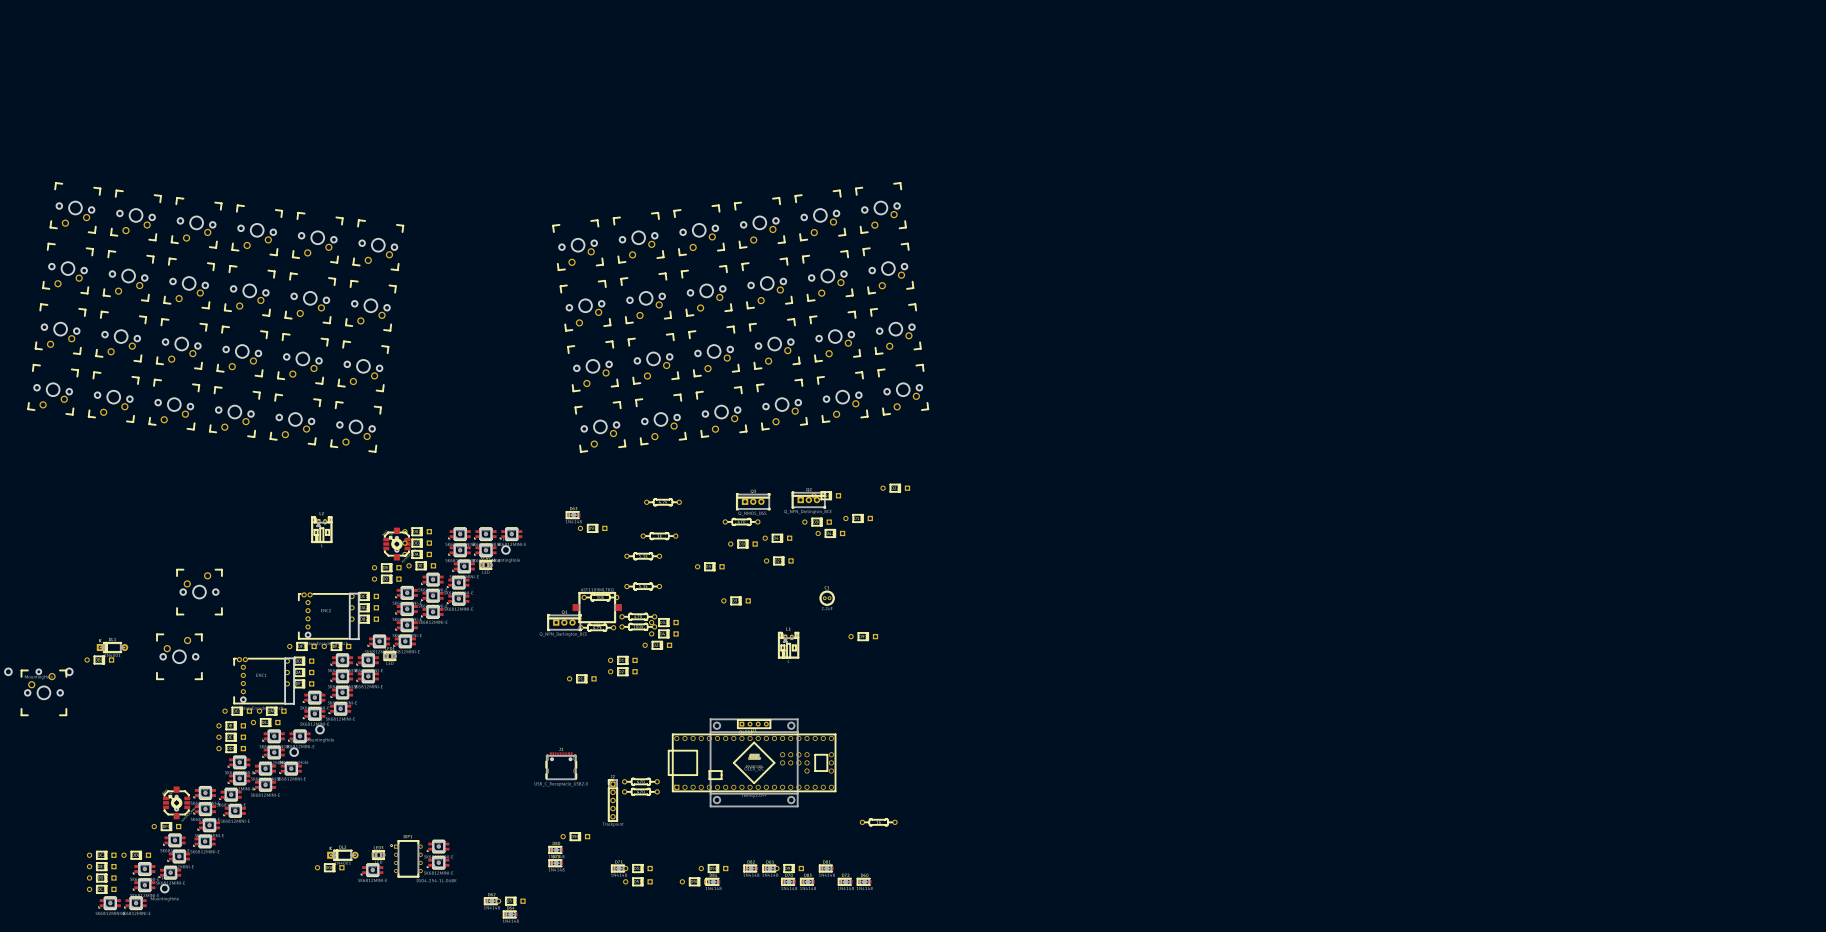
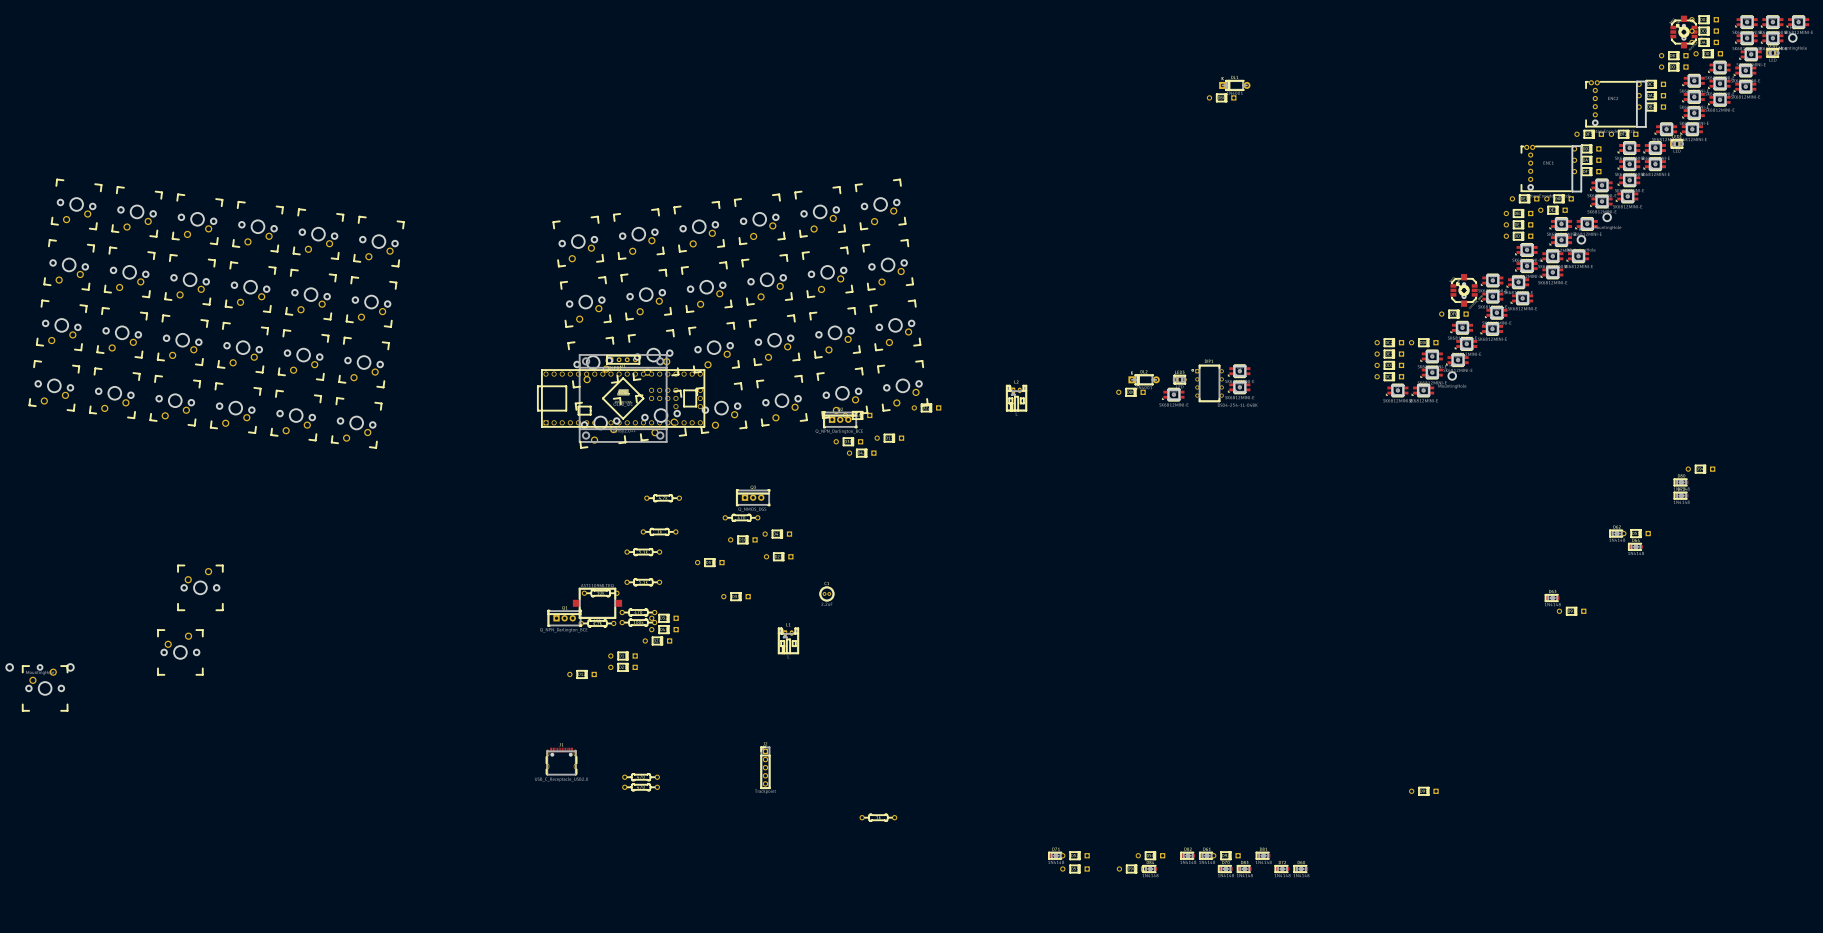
part position: (895, 488) -> (926, 407)
part position: (826, 495) -> (857, 415)
part position: (808, 499) -> (840, 419)
part position: (573, 515) -> (1552, 597)
part position: (858, 518) -> (889, 438)
part position: (817, 522) -> (848, 441)
part position: (592, 528) -> (1571, 611)
part position: (321, 529) -> (1016, 398)
part position: (417, 531) -> (1704, 19)
part position: (830, 533) -> (861, 453)
part position: (459, 534) -> (1746, 22)
part position: (485, 534) -> (1772, 22)
part position: (511, 534) -> (1797, 22)
part position: (417, 543) -> (1704, 31)
part position: (396, 544) -> (1683, 32)
part position: (505, 549) -> (1792, 37)
part position: (459, 550) -> (1746, 38)
part position: (485, 550) -> (1772, 38)
part position: (417, 554) -> (1704, 42)
part position: (421, 565) -> (1708, 53)
part position: (485, 565) -> (1772, 52)
part position: (463, 566) -> (1750, 54)
part position: (386, 567) -> (1673, 55)
part position: (386, 579) -> (1673, 67)
part position: (432, 579) -> (1719, 67)
part position: (458, 582) -> (1745, 70)
part position: (406, 592) -> (1693, 80)
part position: (432, 595) -> (1719, 83)
part position: (364, 596) -> (1651, 84)
part position: (458, 598) -> (1745, 86)
part position: (364, 607) -> (1651, 95)
part position: (406, 609) -> (1693, 96)
part position: (432, 611) -> (1719, 99)
part position: (328, 615) -> (1615, 103)
part position: (364, 619) -> (1651, 107)
part position: (406, 625) -> (1693, 113)
part position: (863, 636) -> (1423, 791)
part position: (378, 641) -> (1665, 129)
part position: (404, 641) -> (1691, 129)
part position: (301, 646) -> (1589, 134)
part position: (336, 646) -> (1623, 134)
part position: (112, 647) -> (1234, 85)
part position: (389, 656) -> (1676, 143)
part position: (99, 660) -> (1221, 97)
part position: (341, 660) -> (1628, 148)
part position: (367, 660) -> (1654, 148)
part position: (299, 661) -> (1586, 148)
part position: (299, 672) -> (1586, 160)
part position: (341, 676) -> (1628, 164)
part position: (367, 676) -> (1654, 164)
part position: (264, 680) -> (1551, 168)
part position: (299, 683) -> (1586, 171)
part position: (341, 692) -> (1628, 180)
part position: (314, 697) -> (1601, 185)
part position: (339, 708) -> (1627, 196)
part position: (237, 711) -> (1524, 198)
part position: (271, 711) -> (1559, 198)
part position: (314, 713) -> (1601, 201)
part position: (265, 722) -> (1552, 210)
part position: (231, 725) -> (1518, 213)
part position: (319, 729) -> (1607, 217)
part position: (273, 736) -> (1560, 223)
part position: (299, 736) -> (1586, 223)
part position: (231, 737) -> (1518, 224)
part position: (231, 748) -> (1518, 236)
part position: (273, 752) -> (1560, 240)
part position: (294, 752) -> (1581, 239)
part position: (239, 762) -> (1526, 249)
part position: (752, 762) -> (621, 398)
part position: (754, 762) -> (623, 398)
part position: (264, 768) -> (1552, 256)
part position: (290, 768) -> (1577, 256)
part position: (239, 778) -> (1526, 266)
part position: (264, 784) -> (1552, 272)
part position: (204, 792) -> (1492, 280)
part position: (230, 794) -> (1517, 282)
part position: (612, 800) -> (765, 767)
part position: (176, 802) -> (1464, 290)
part position: (204, 809) -> (1492, 296)
part position: (234, 810) -> (1521, 298)
part position: (208, 825) -> (1496, 312)
part position: (166, 826) -> (1453, 314)
part position: (575, 836) -> (1700, 469)
part position: (174, 840) -> (1461, 327)
part position: (204, 841) -> (1491, 328)
part position: (438, 846) -> (1239, 371)
part position: (556, 849) -> (1681, 482)
part position: (101, 855) -> (1389, 342)
part position: (136, 855) -> (1423, 342)
part position: (342, 855) -> (1144, 379)
part position: (378, 855) -> (1179, 379)
part position: (178, 856) -> (1466, 343)
part position: (406, 858) -> (1207, 383)
part position: (438, 862) -> (1239, 387)
part position: (556, 863) -> (1681, 495)
part position: (101, 866) -> (1389, 354)
part position: (329, 867) -> (1130, 392)
part position: (618, 868) -> (1055, 855)
part position: (637, 868) -> (1075, 855)
part position: (713, 868) -> (1150, 855)
part position: (750, 868) -> (1187, 855)
part position: (769, 868) -> (1206, 855)
part position: (789, 868) -> (1225, 855)
part position: (826, 868) -> (1263, 855)
part position: (144, 869) -> (1431, 356)
part position: (372, 870) -> (1173, 394)
part position: (169, 872) -> (1457, 360)
part position: (101, 878) -> (1389, 365)
part position: (637, 881) -> (1075, 869)
part position: (694, 881) -> (1131, 869)
part position: (713, 881) -> (1150, 869)
part position: (788, 881) -> (1225, 869)
part position: (807, 881) -> (1244, 869)
part position: (845, 881) -> (1282, 869)
part position: (864, 881) -> (1301, 869)
part position: (144, 885) -> (1431, 372)
part position: (164, 888) -> (1452, 375)
part position: (101, 889) -> (1389, 376)
part position: (491, 901) -> (1616, 533)
part position: (510, 901) -> (1636, 533)
part position: (109, 903) -> (1397, 390)
part position: (135, 903) -> (1422, 390)
part position: (510, 914) -> (1635, 546)

